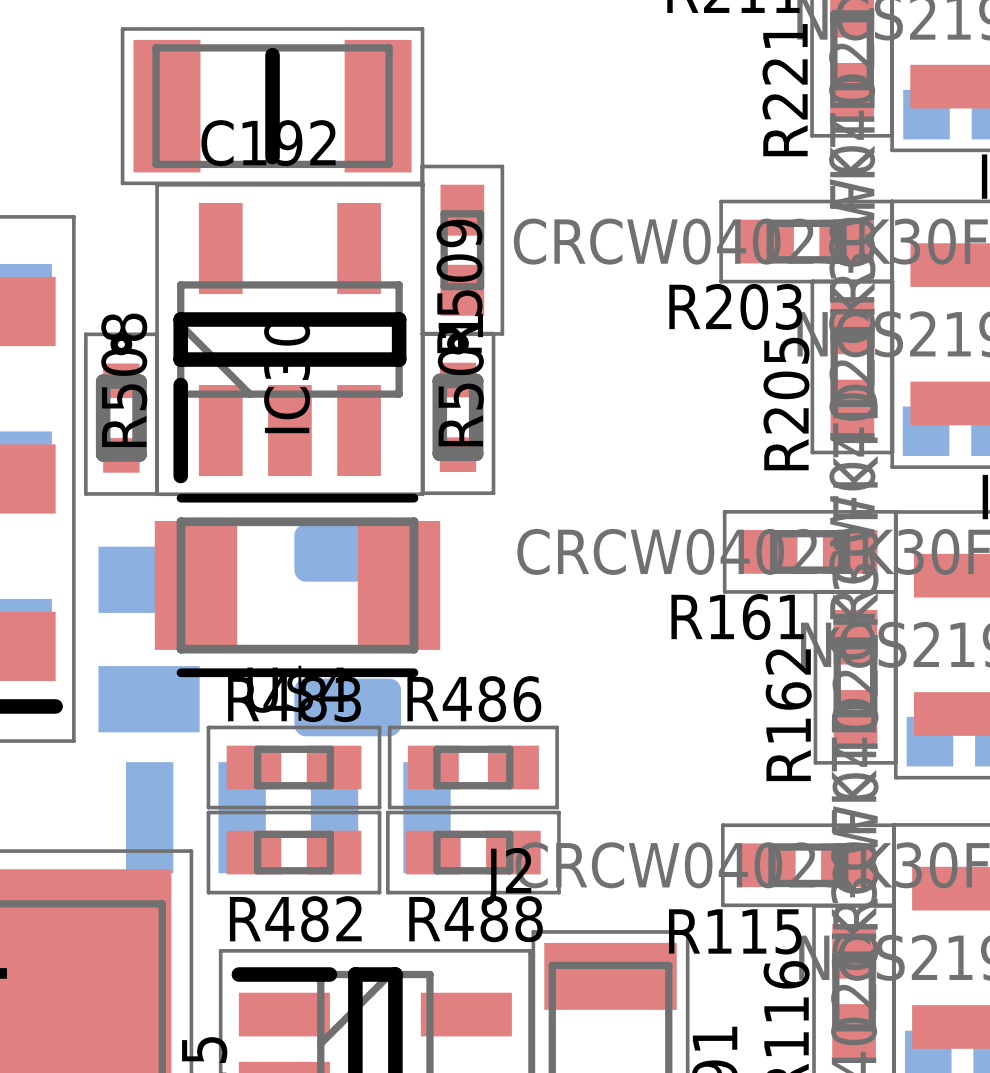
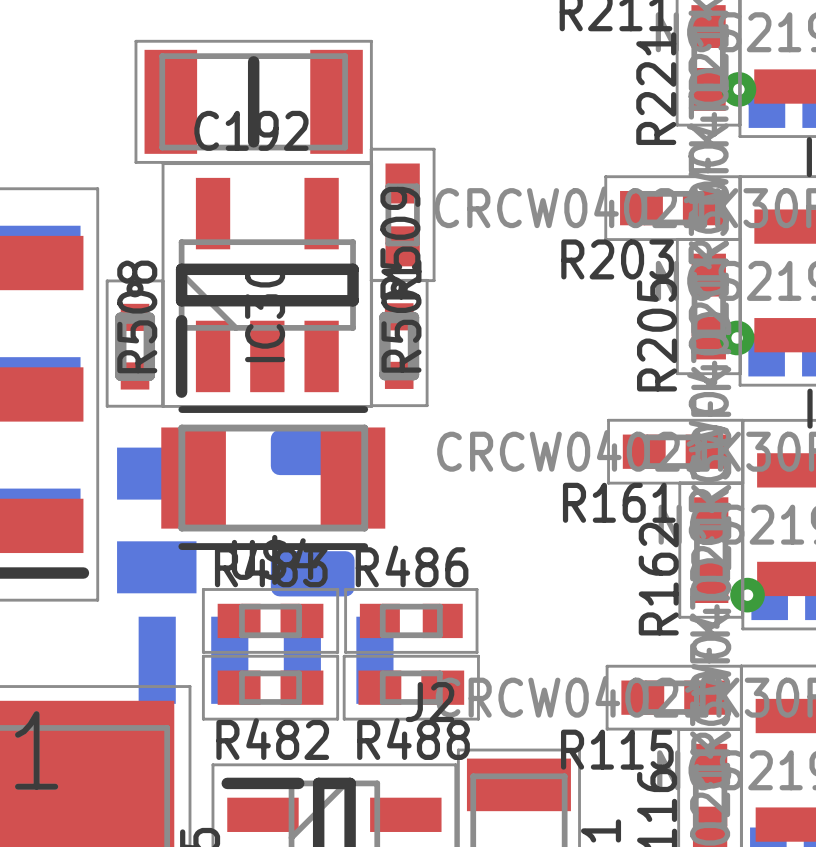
via: none -> (738, 89)
via: none -> (737, 337)
via: none -> (747, 595)

